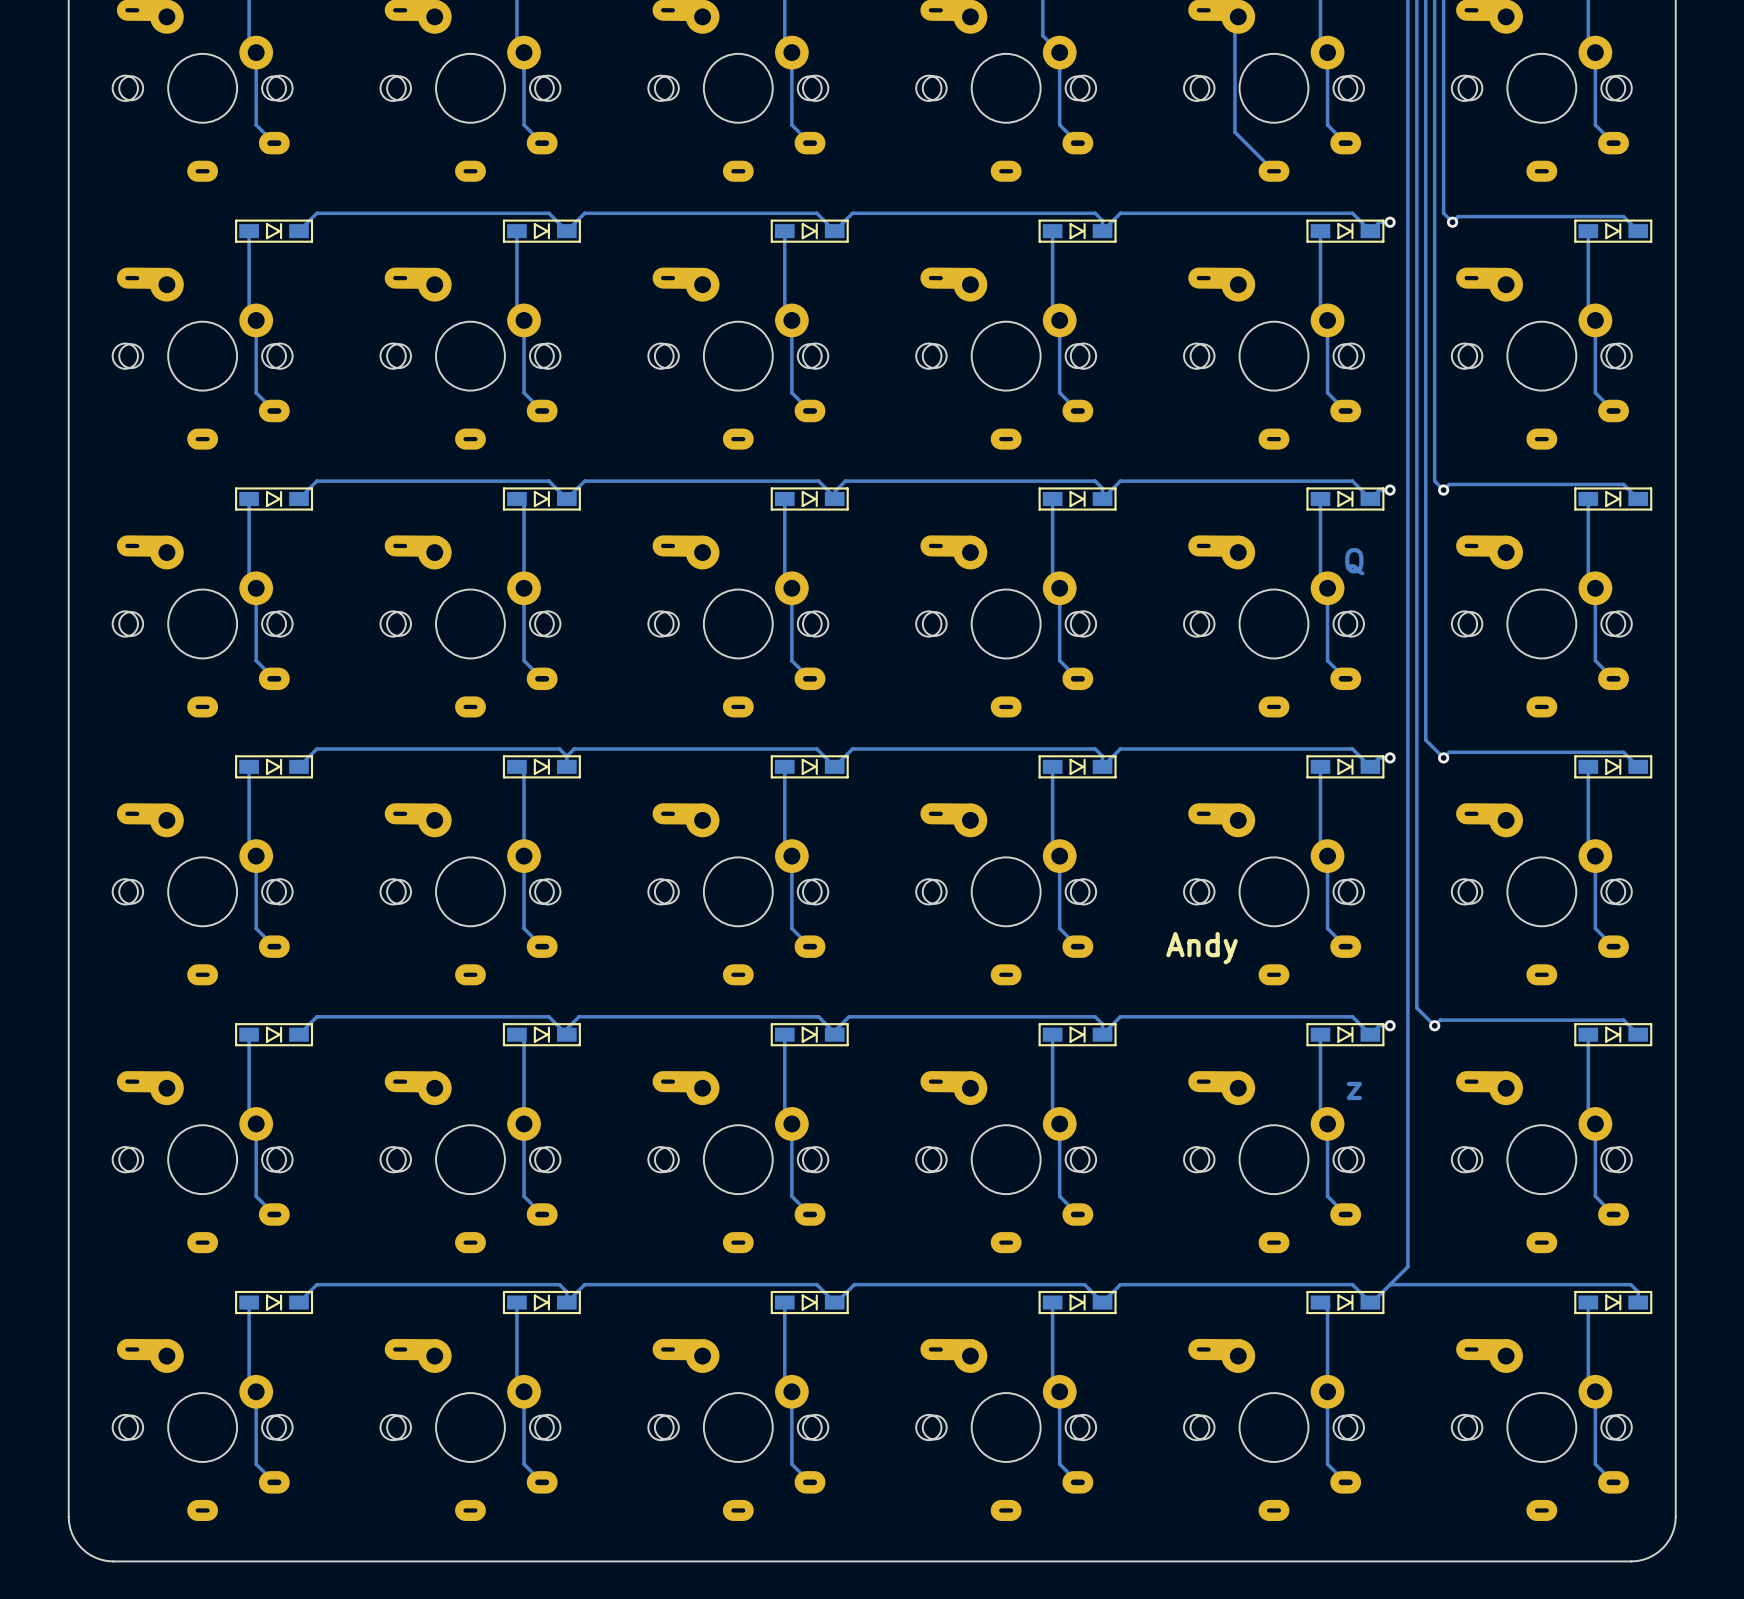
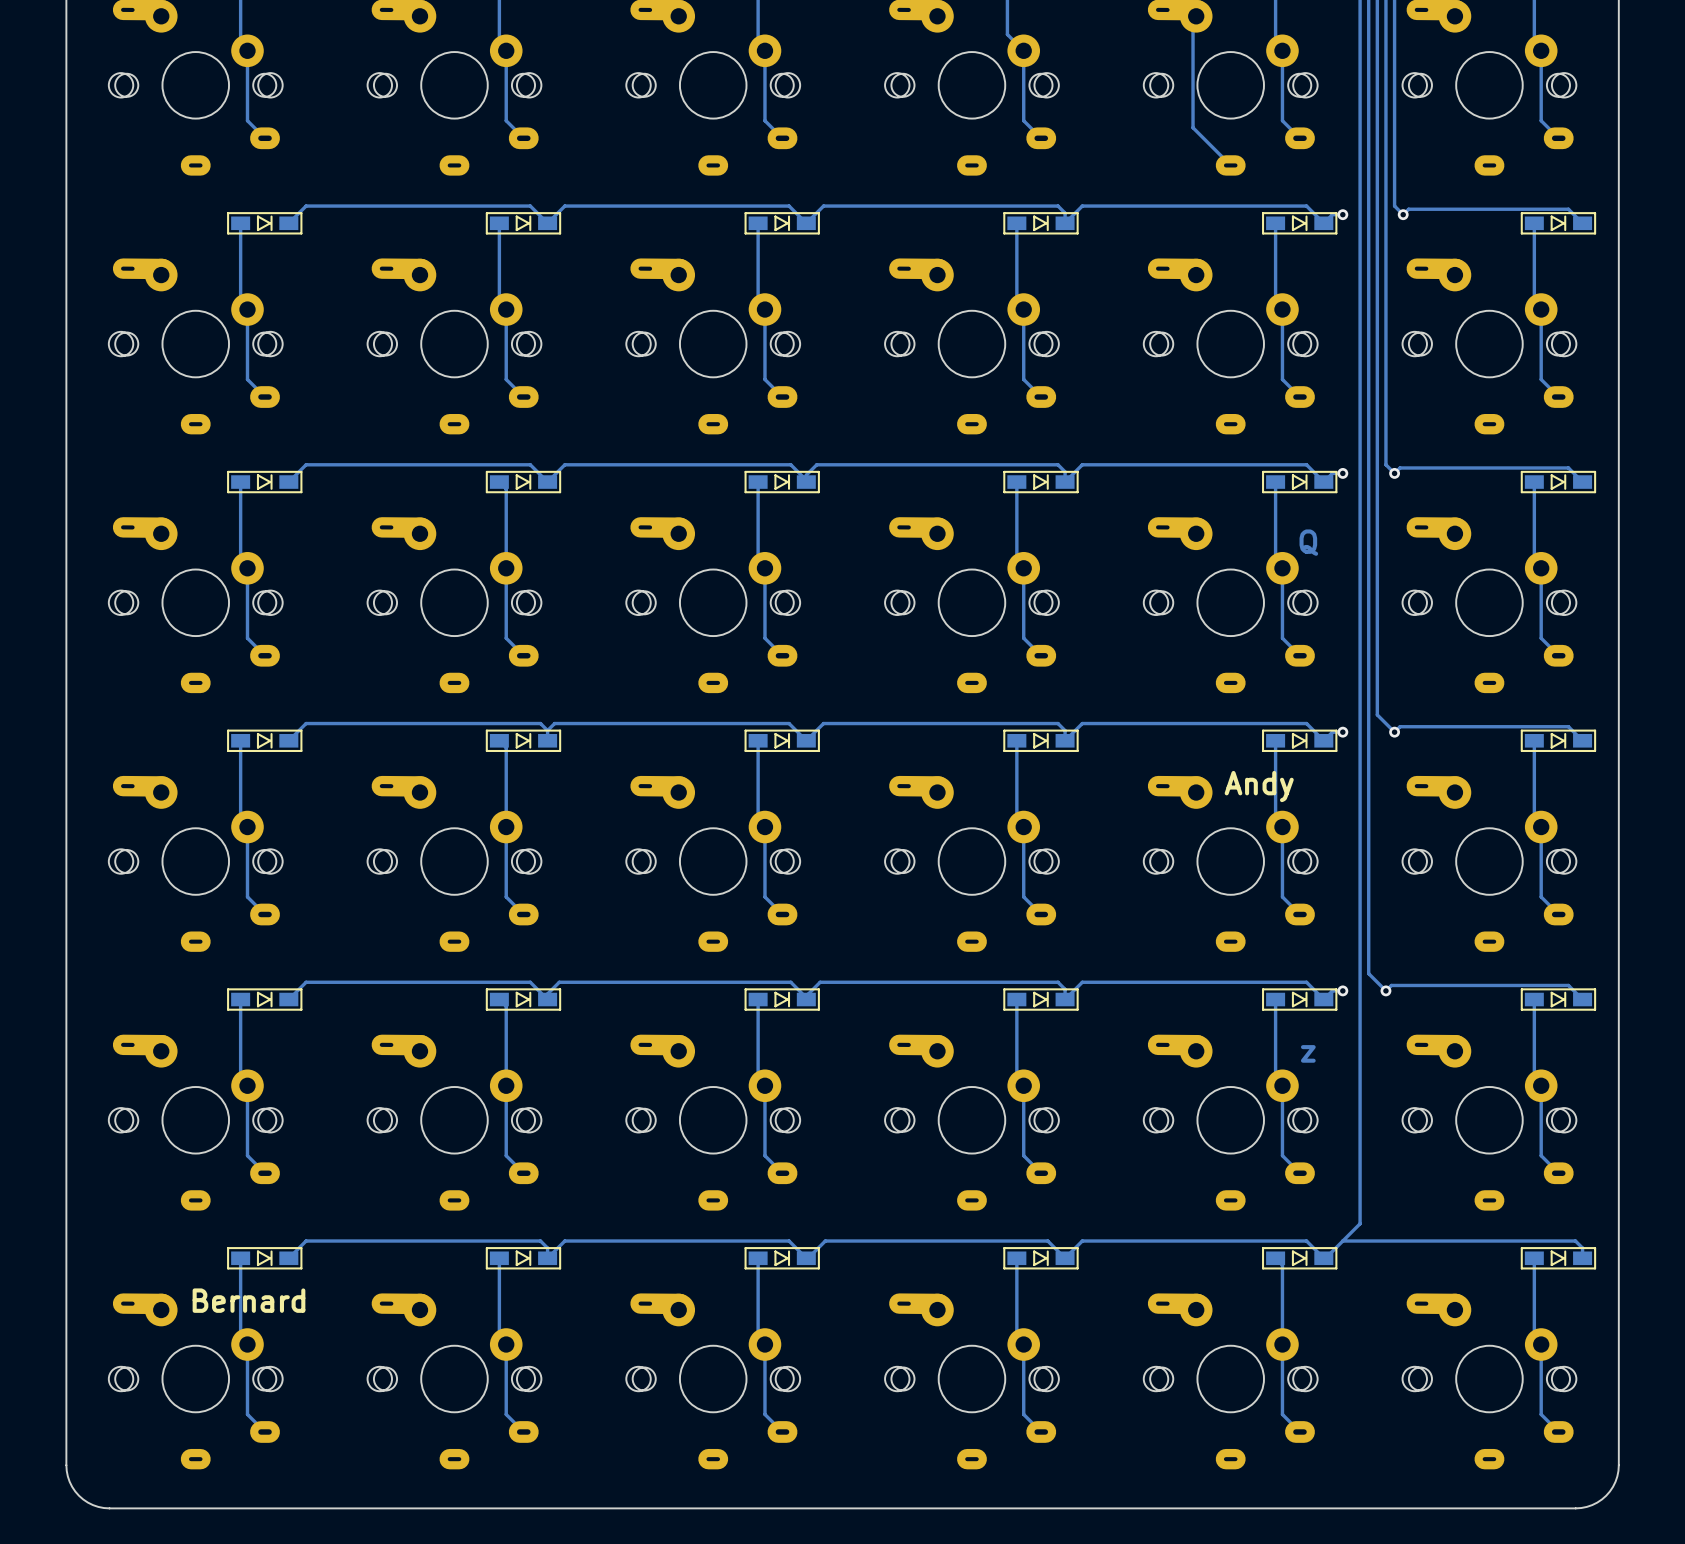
text position: Andy (1202, 948) -> Andy (1259, 786)
text: none -> Bernard (248, 1300)

